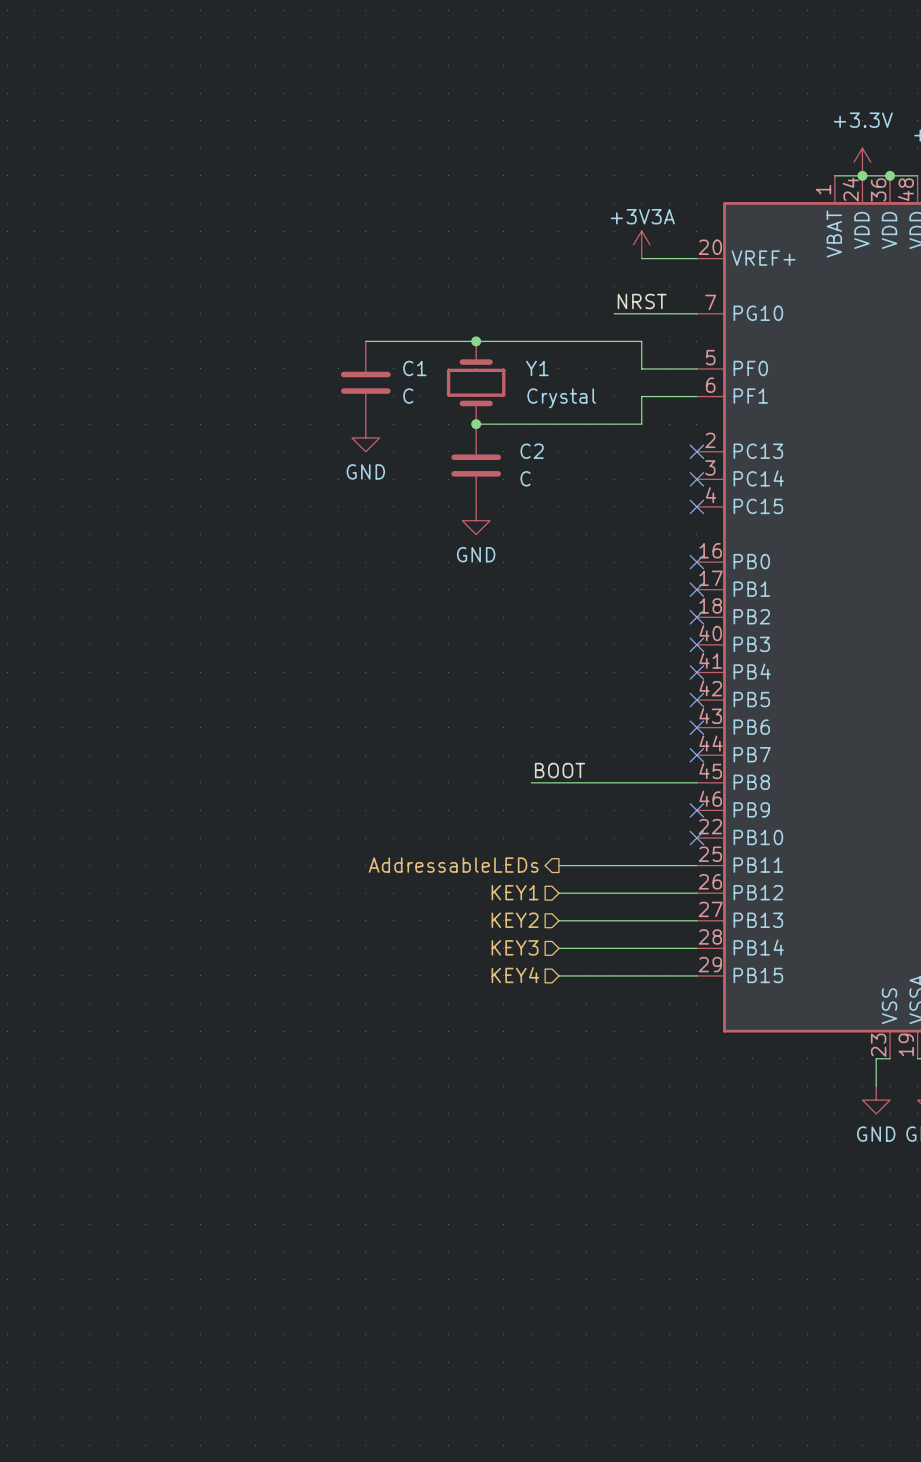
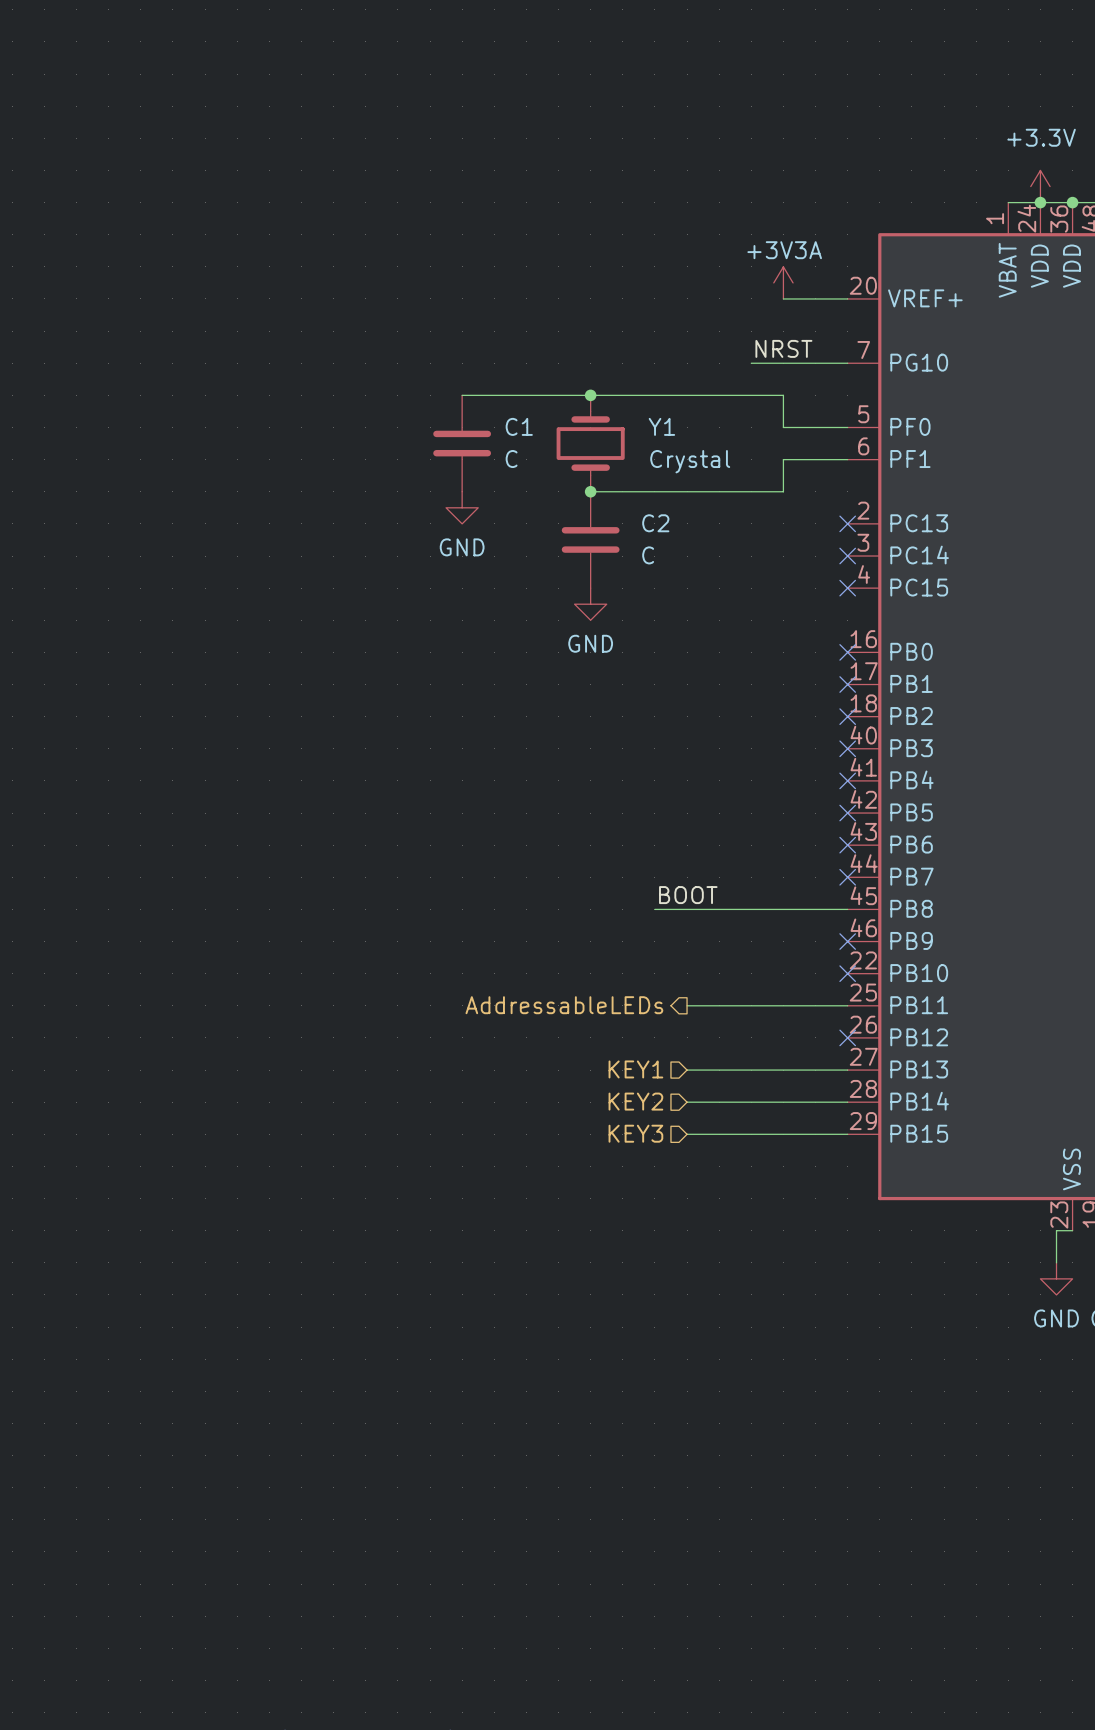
hierarchical label: KEY1 (515, 892) -> none
wire: (558, 893) (696, 893) -> none
no-connect mark: none -> (847, 1037)
hierarchical label: KEY2 (515, 920) -> KEY1 (635, 1069)
hierarchical label: KEY3 (515, 947) -> KEY2 (635, 1101)
hierarchical label: KEY4 (515, 975) -> KEY3 (635, 1133)

